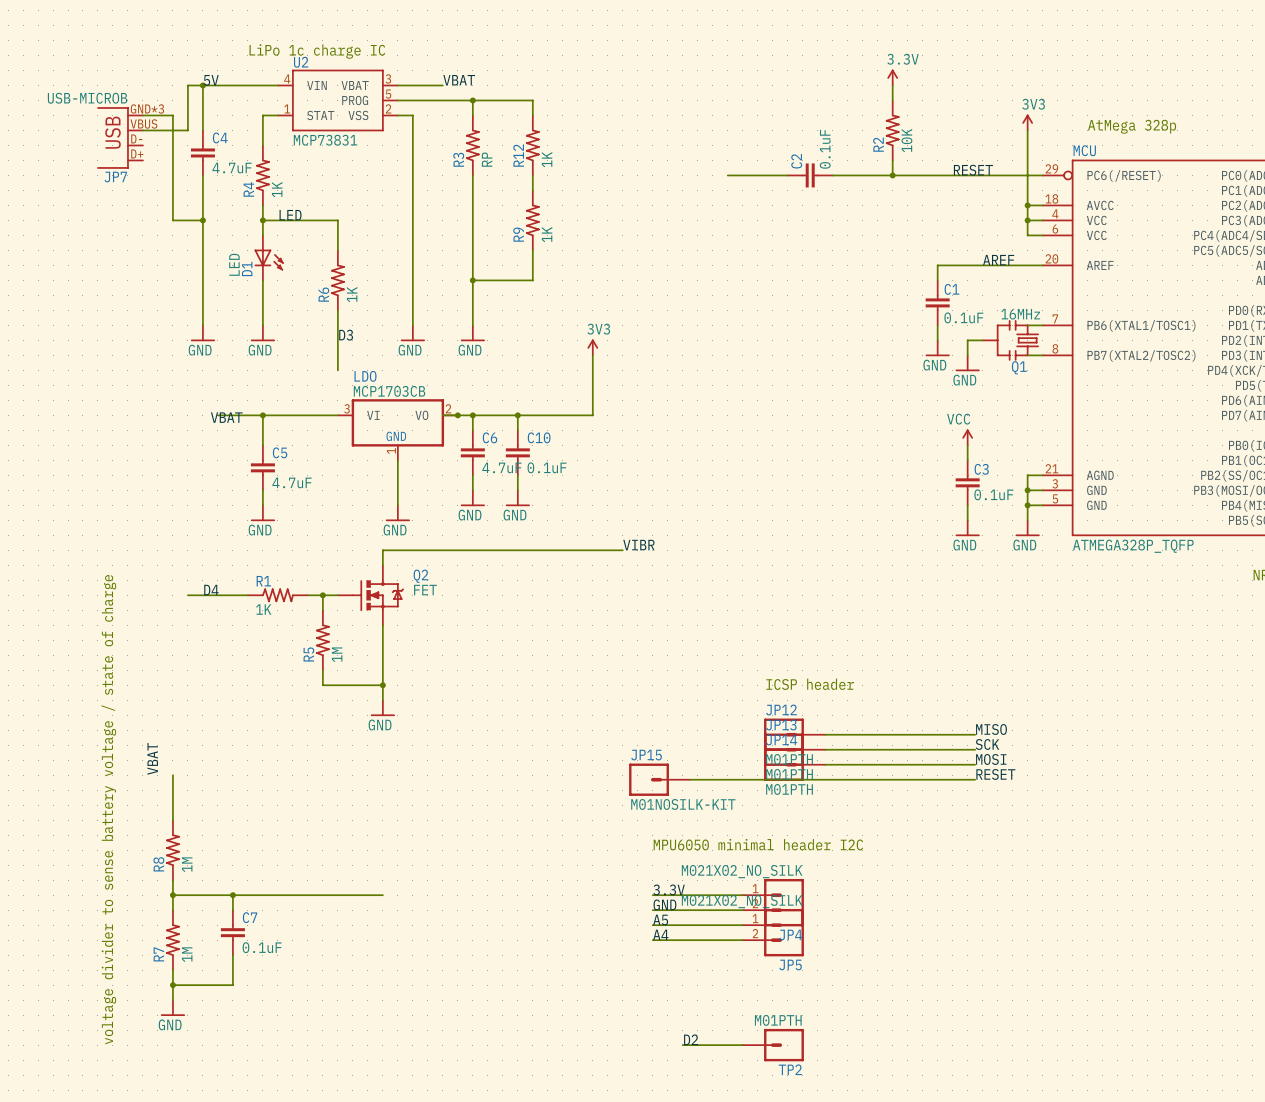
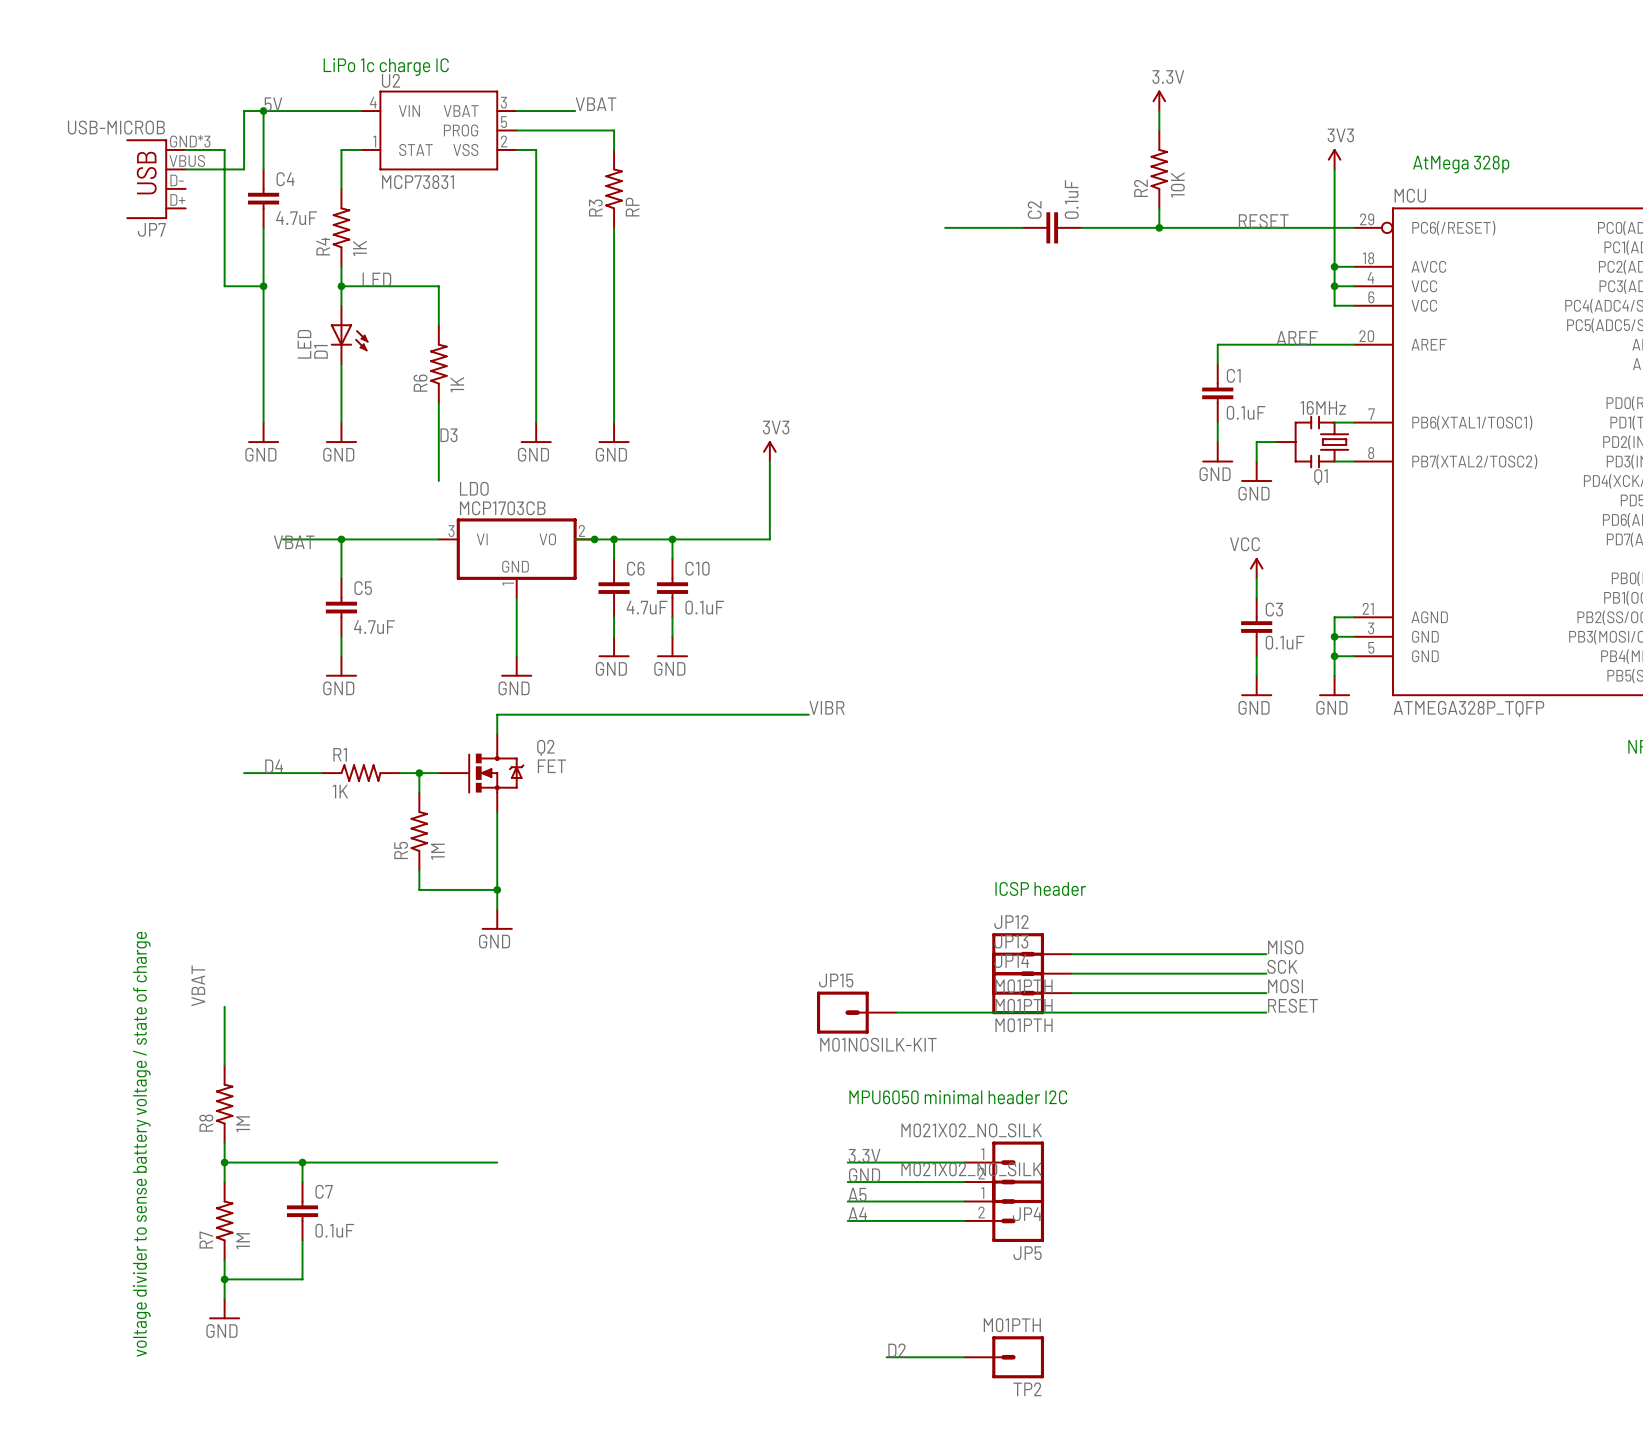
wire: (472, 100) (532, 100) (532, 115) -> none
junction: (472, 100) -> none
R12: 1K (532, 145) -> none
wire: (532, 175) (532, 190) -> none
R9: 1K (532, 220) -> none
wire: (532, 250) (532, 280) (472, 280) -> none
junction: (472, 280) -> none

